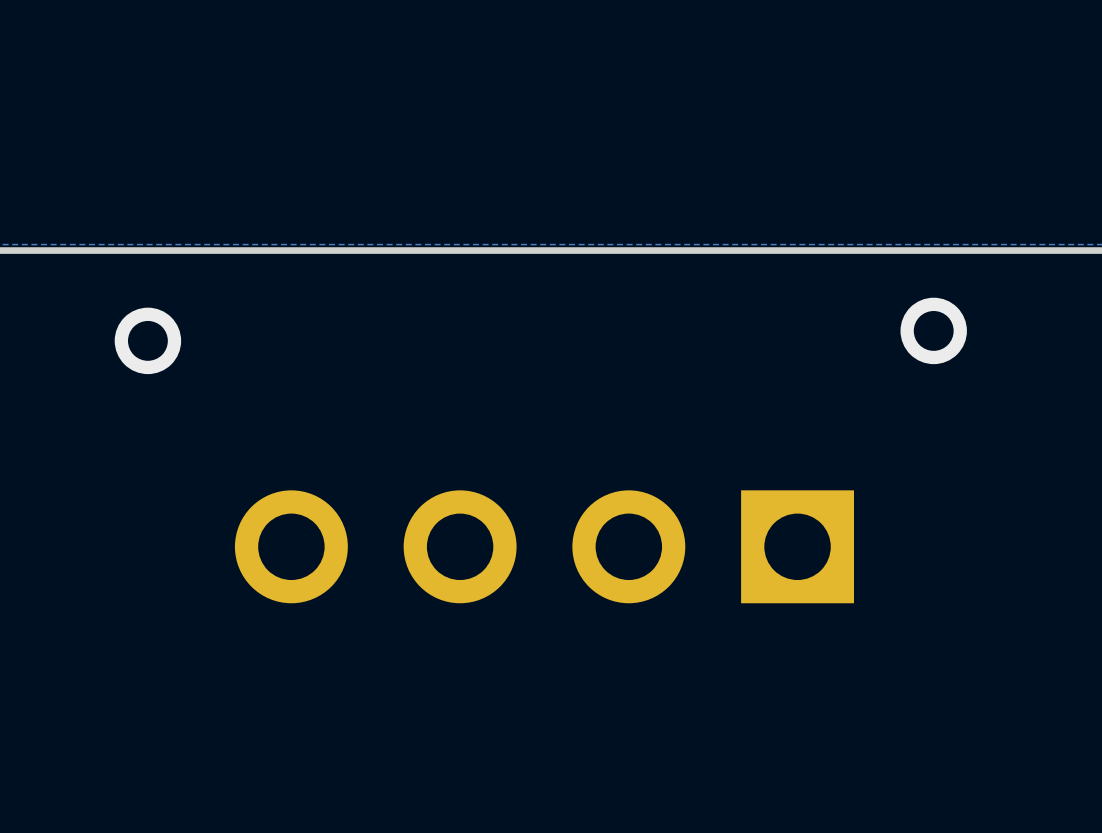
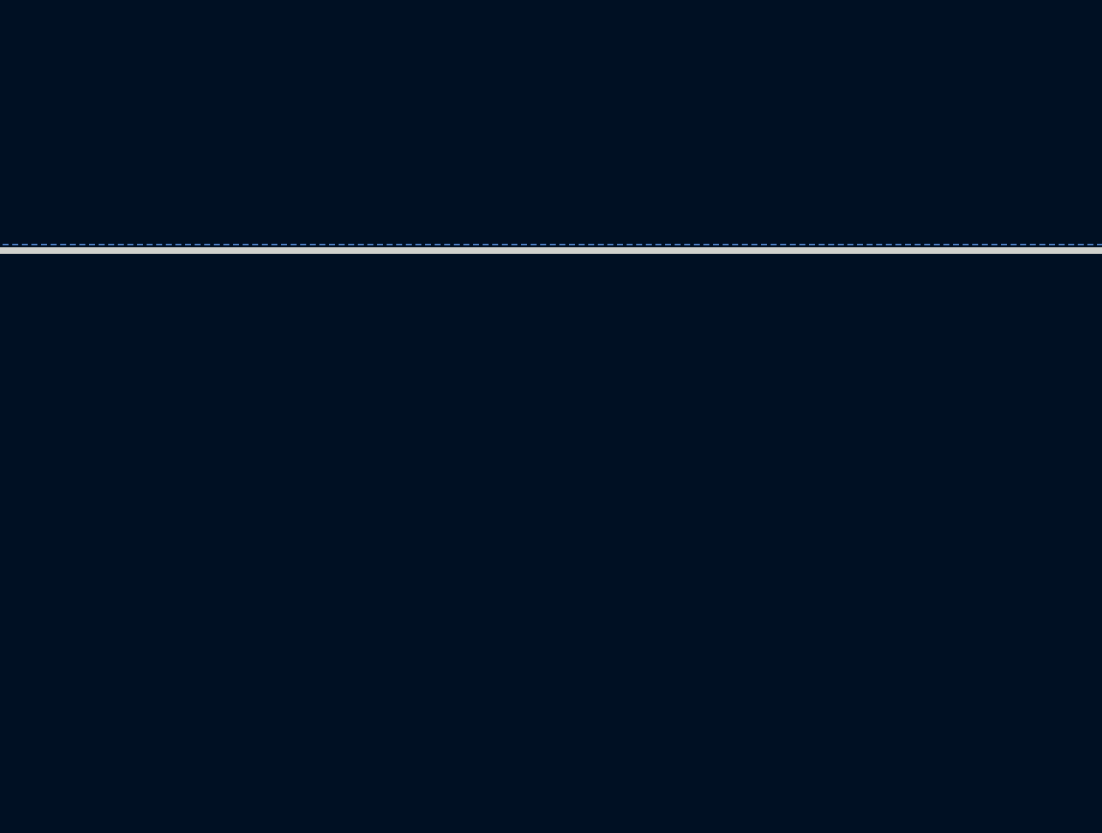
via: (933, 330) -> none
via: (147, 340) -> none
part: (544, 546) -> none

